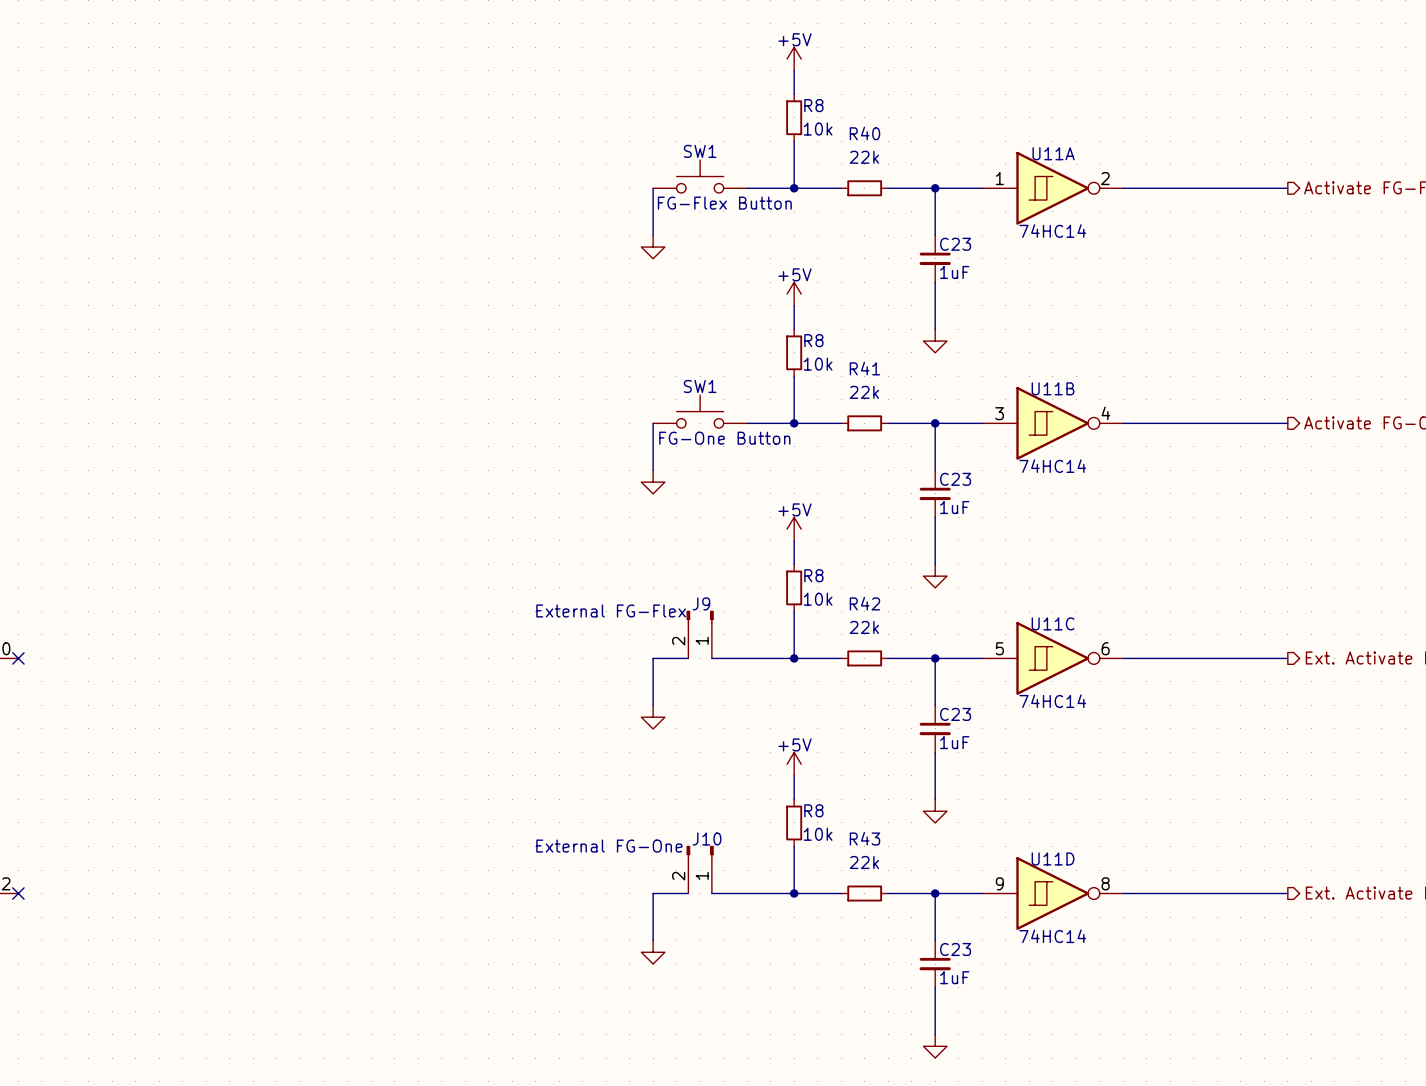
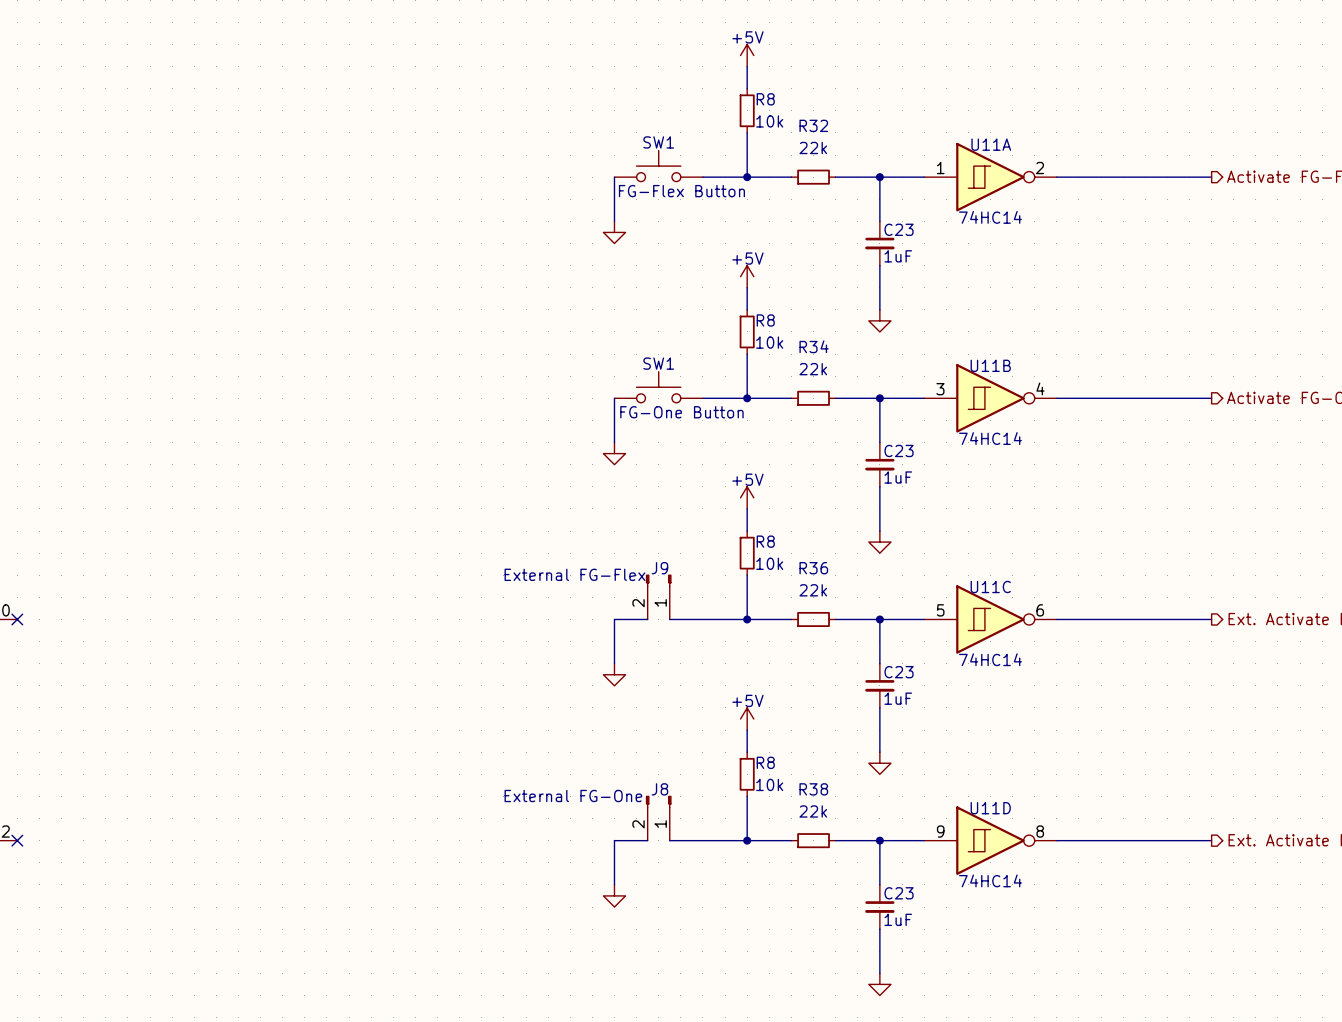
R40 name: R40 (864, 133) -> R32 (813, 125)
R41 name: R41 (864, 368) -> R34 (814, 346)
R42 name: R42 (864, 603) -> R36 (813, 568)
R43 name: R43 (864, 838) -> R38 (813, 789)
J10 name: J10 (707, 839) -> J8 (659, 789)

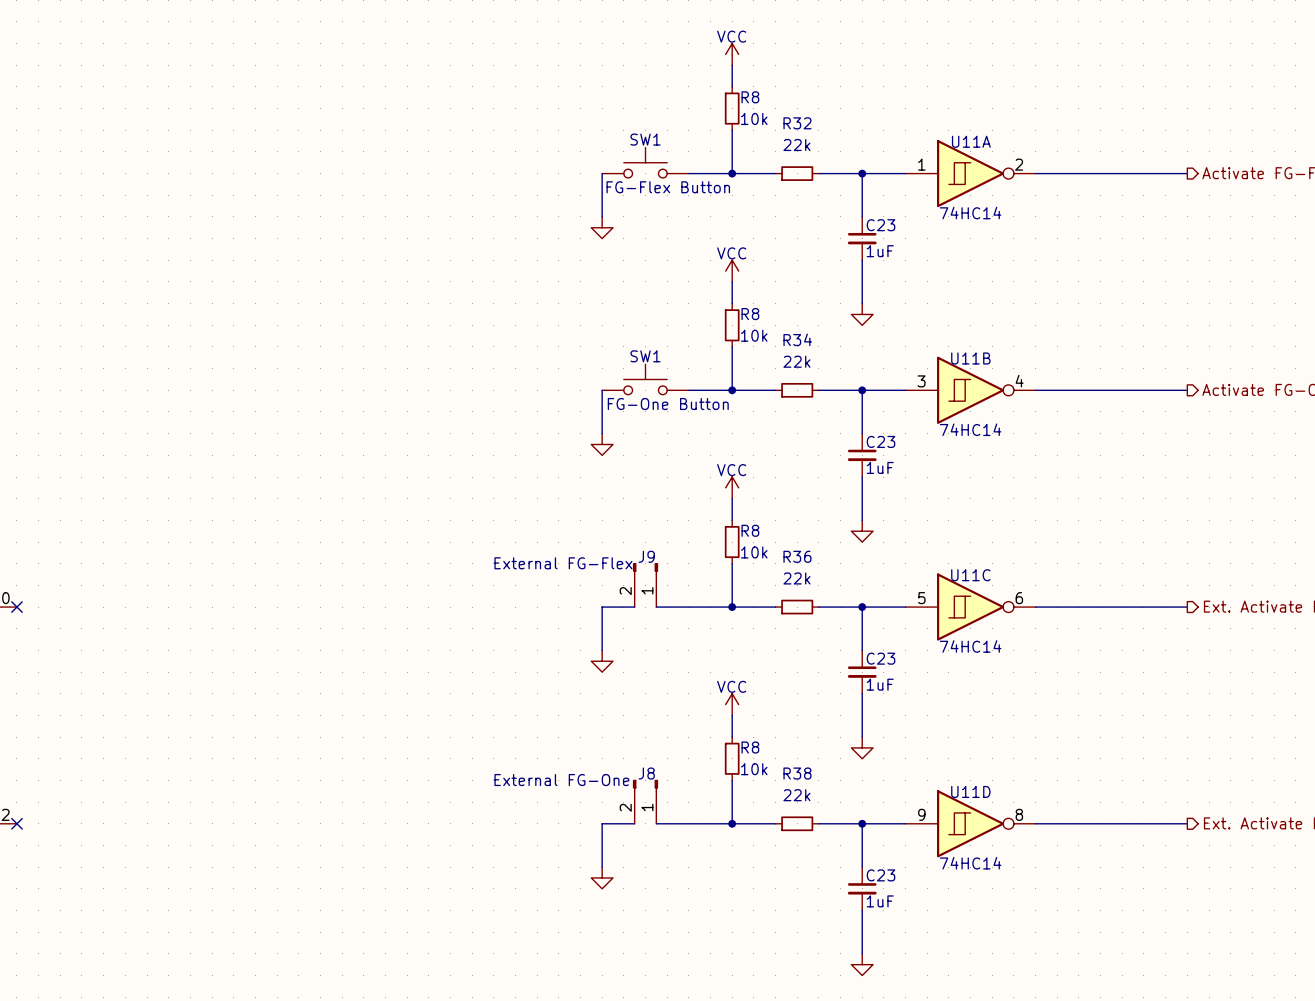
power symbol: +5V (747, 55) -> VCC (732, 54)
power symbol: +5V (747, 276) -> VCC (732, 271)
power symbol: +5V (747, 497) -> VCC (732, 487)
power symbol: +5V (747, 719) -> VCC (732, 704)

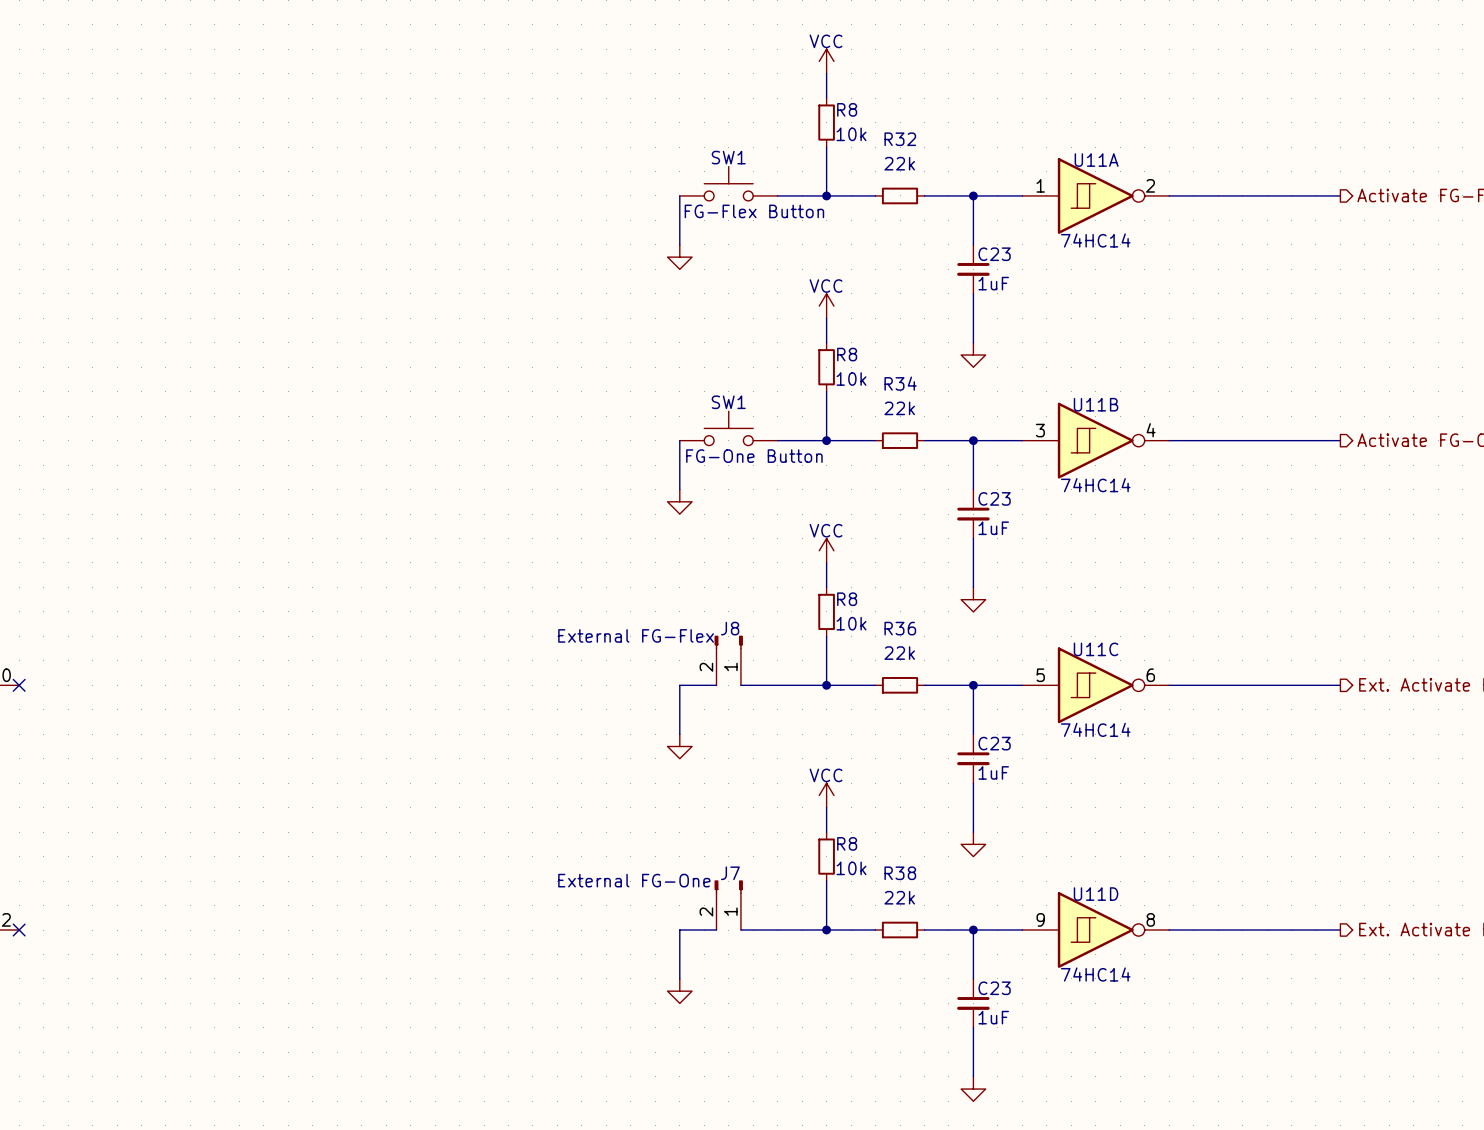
J9 name: J9 (646, 556) -> J8 (730, 628)
J8 name: J8 (646, 773) -> J7 (730, 873)

